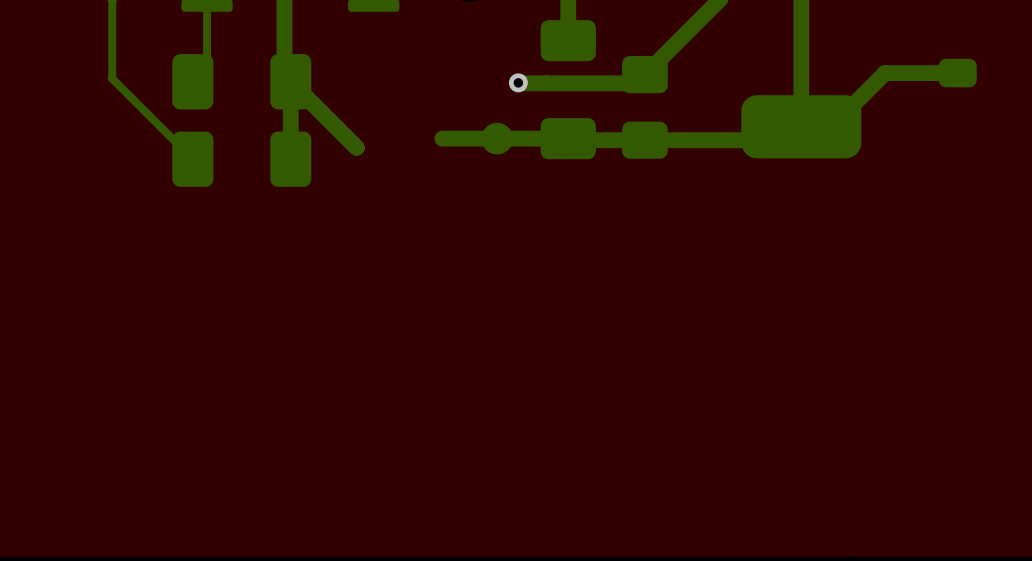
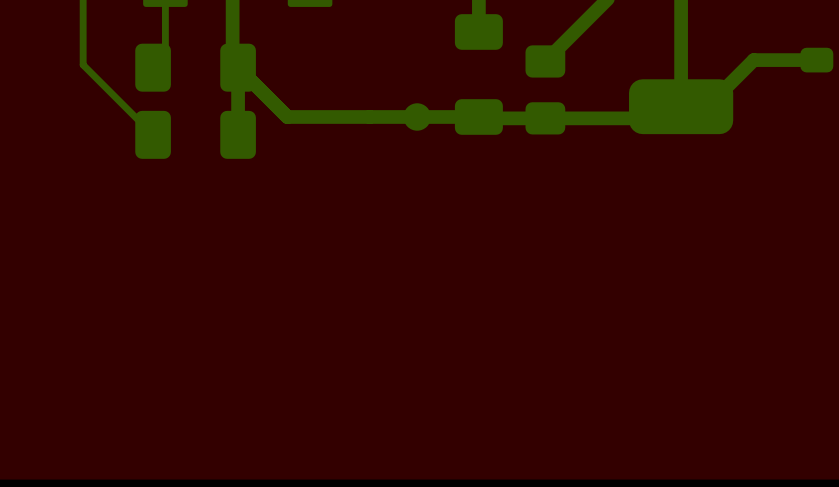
bottom track: (518, 82) (636, 83) -> none
via: (518, 82) -> none
bottom track: (347, 138) (356, 147) -> (287, 116) (369, 116)

